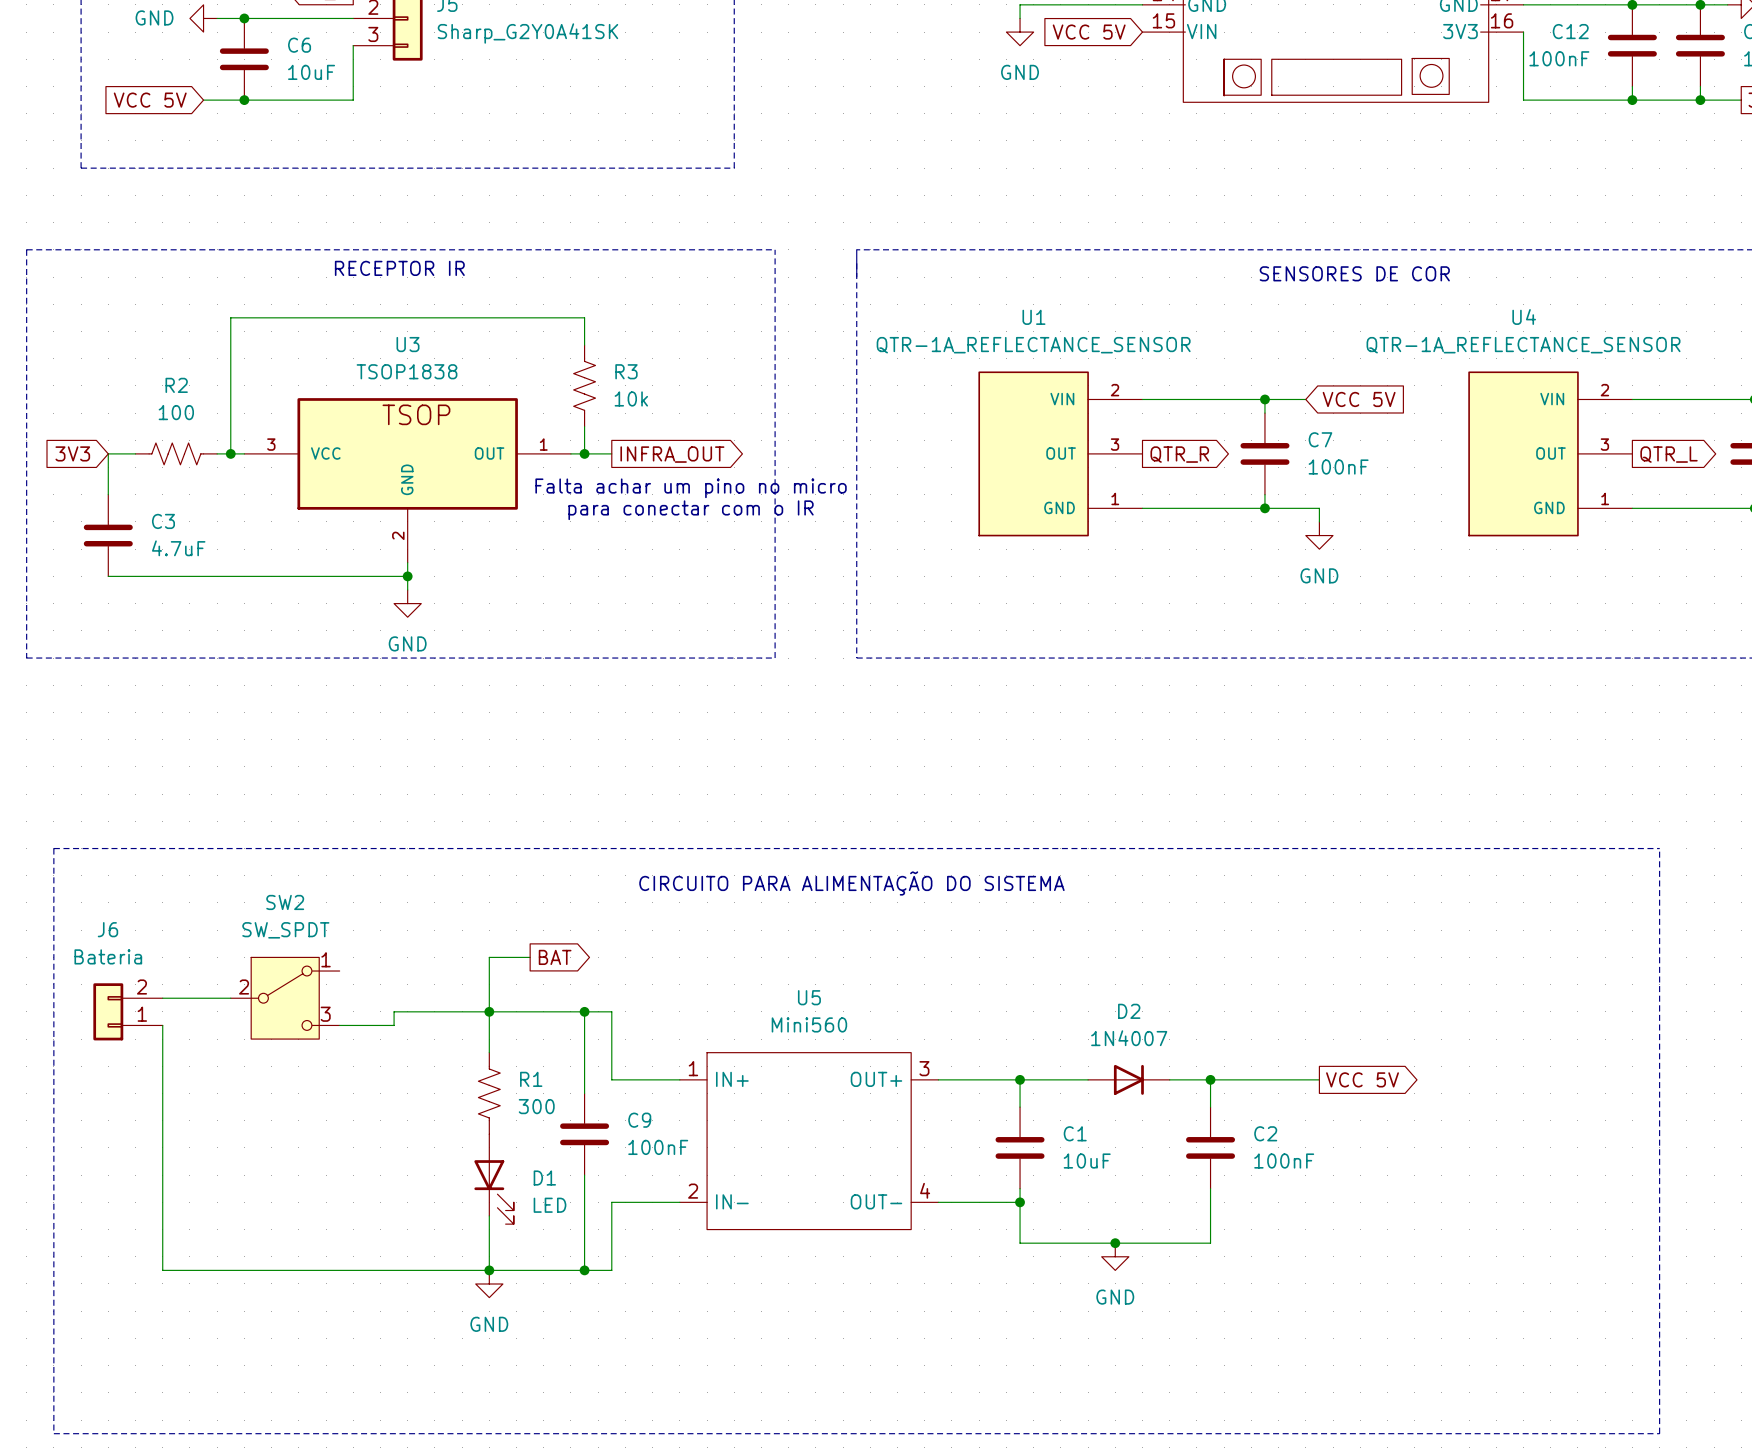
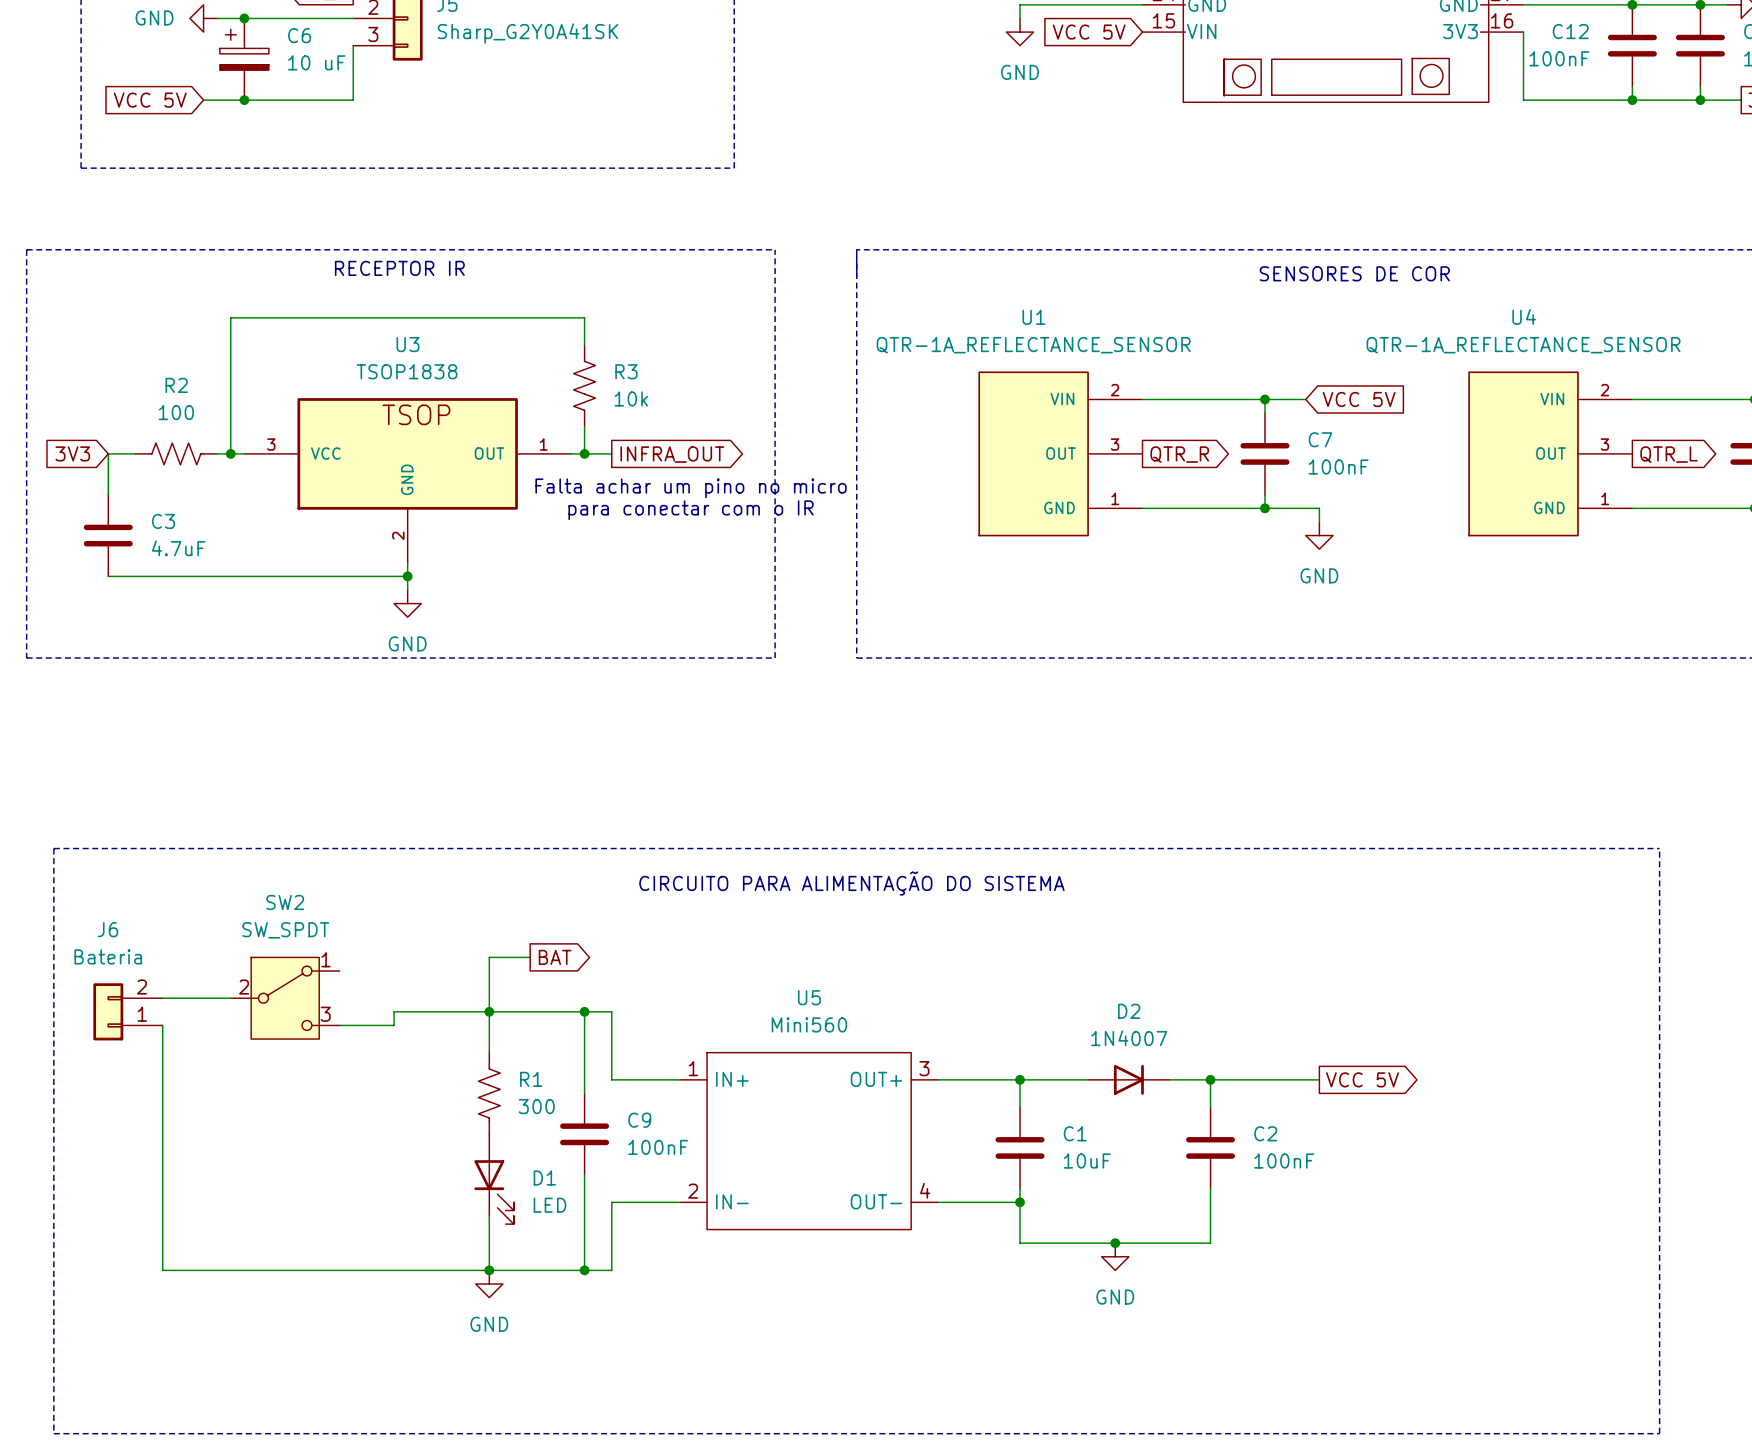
C6 symbol: [219, 18, 269, 101] -> [219, 18, 269, 101]
C6 value: 10uF (311, 72) -> 10 uF (316, 62)

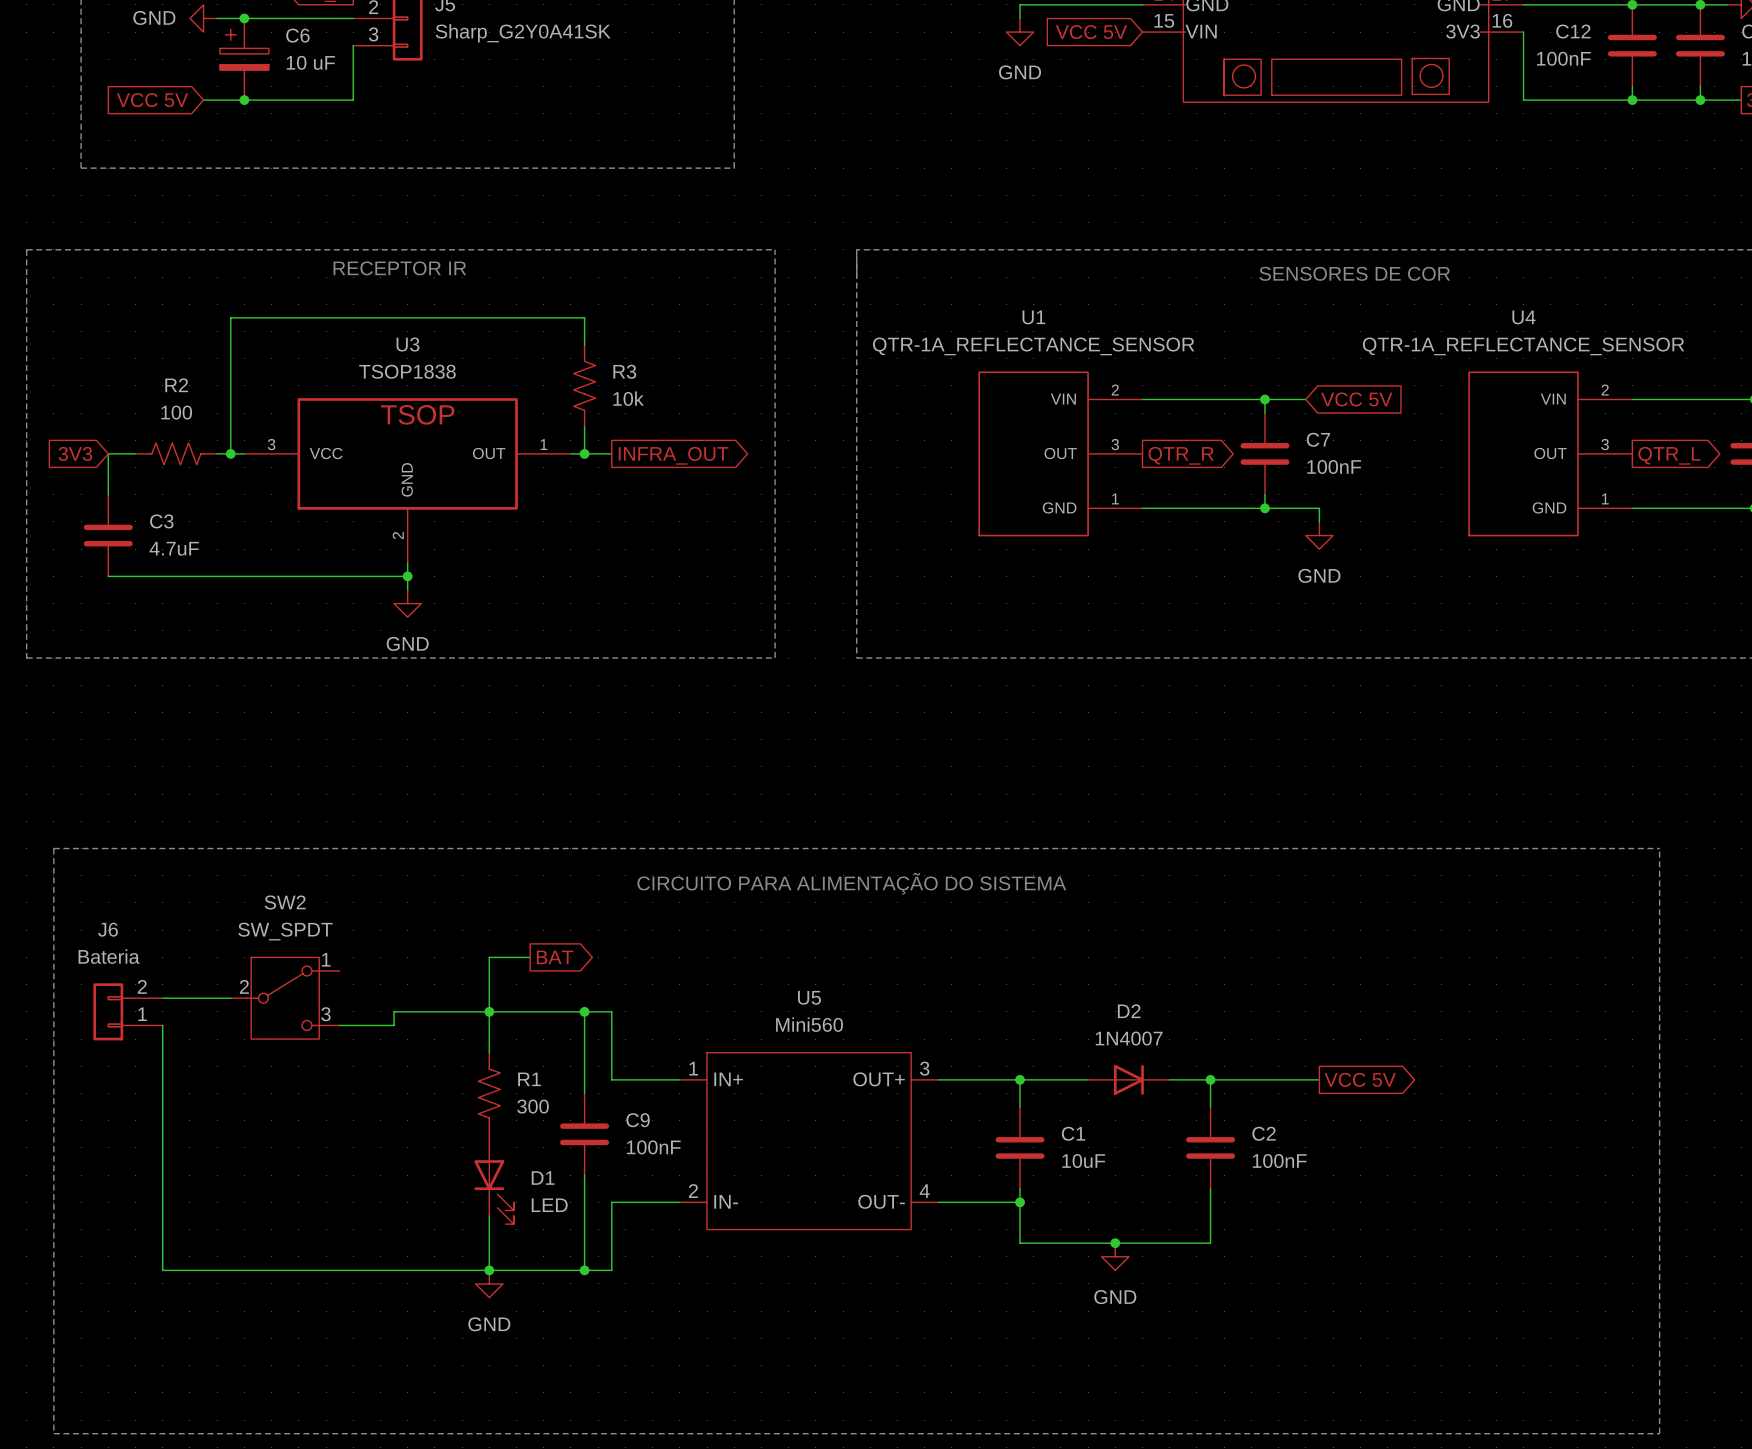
text: Falta achar um pino no micro (691, 488) -> none
text: para conectar com o IR (691, 510) -> none

